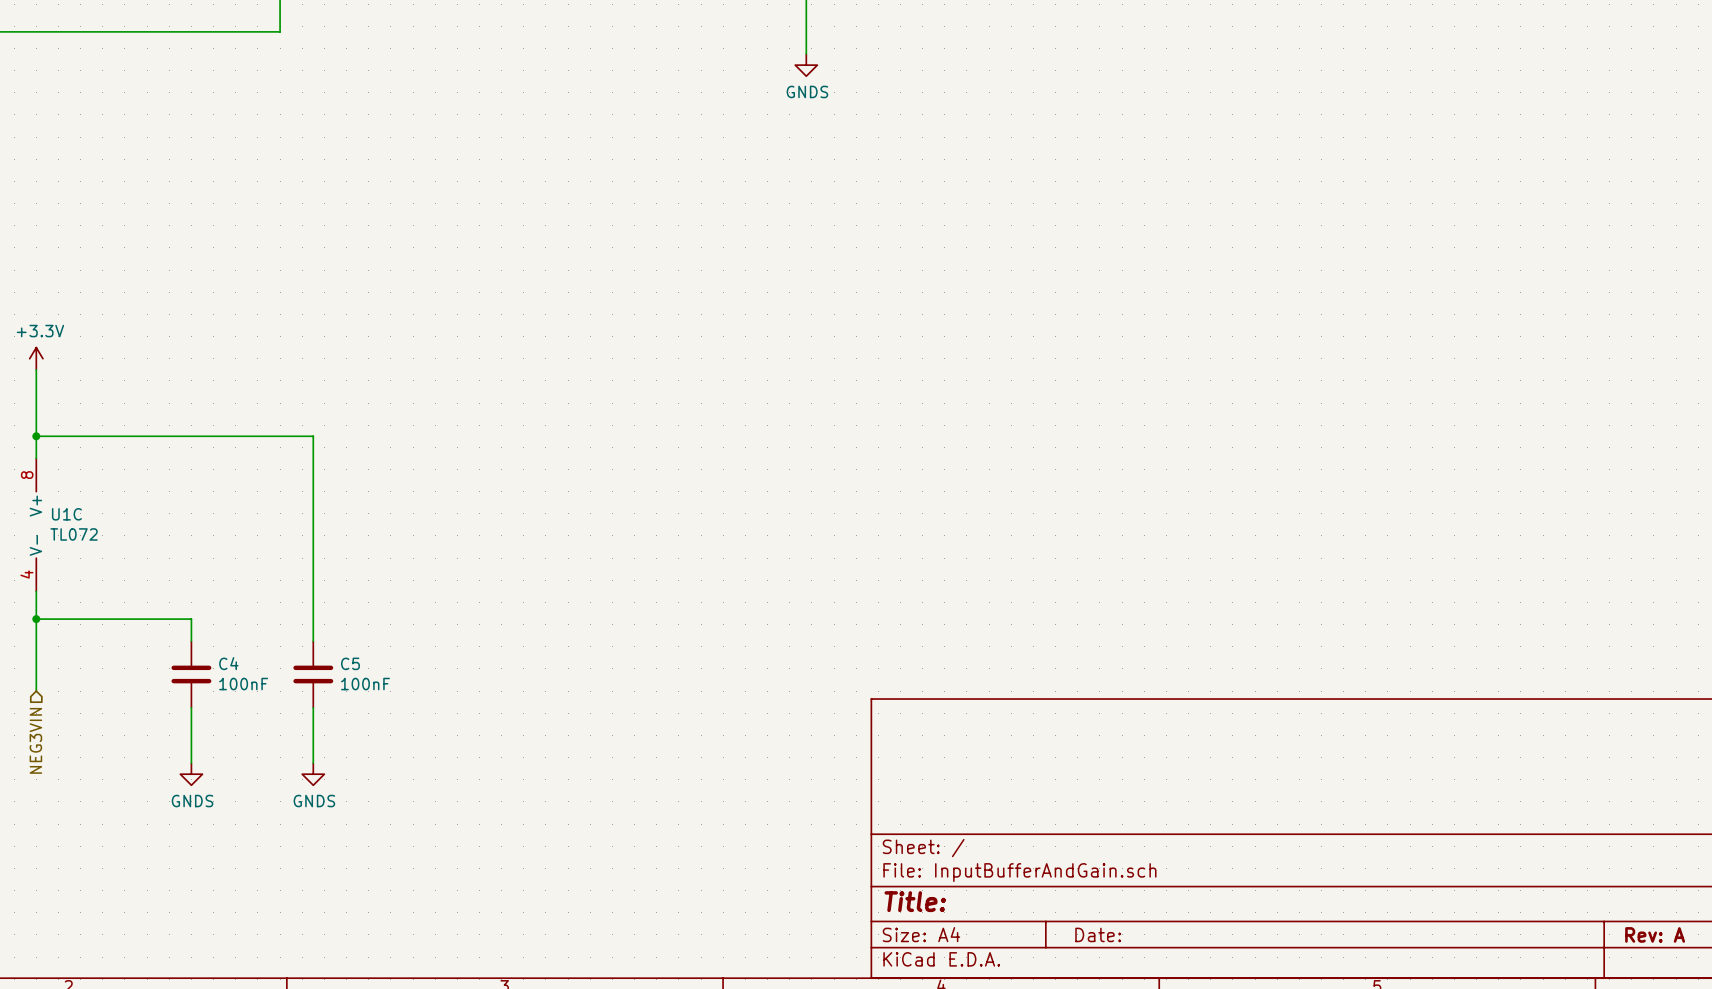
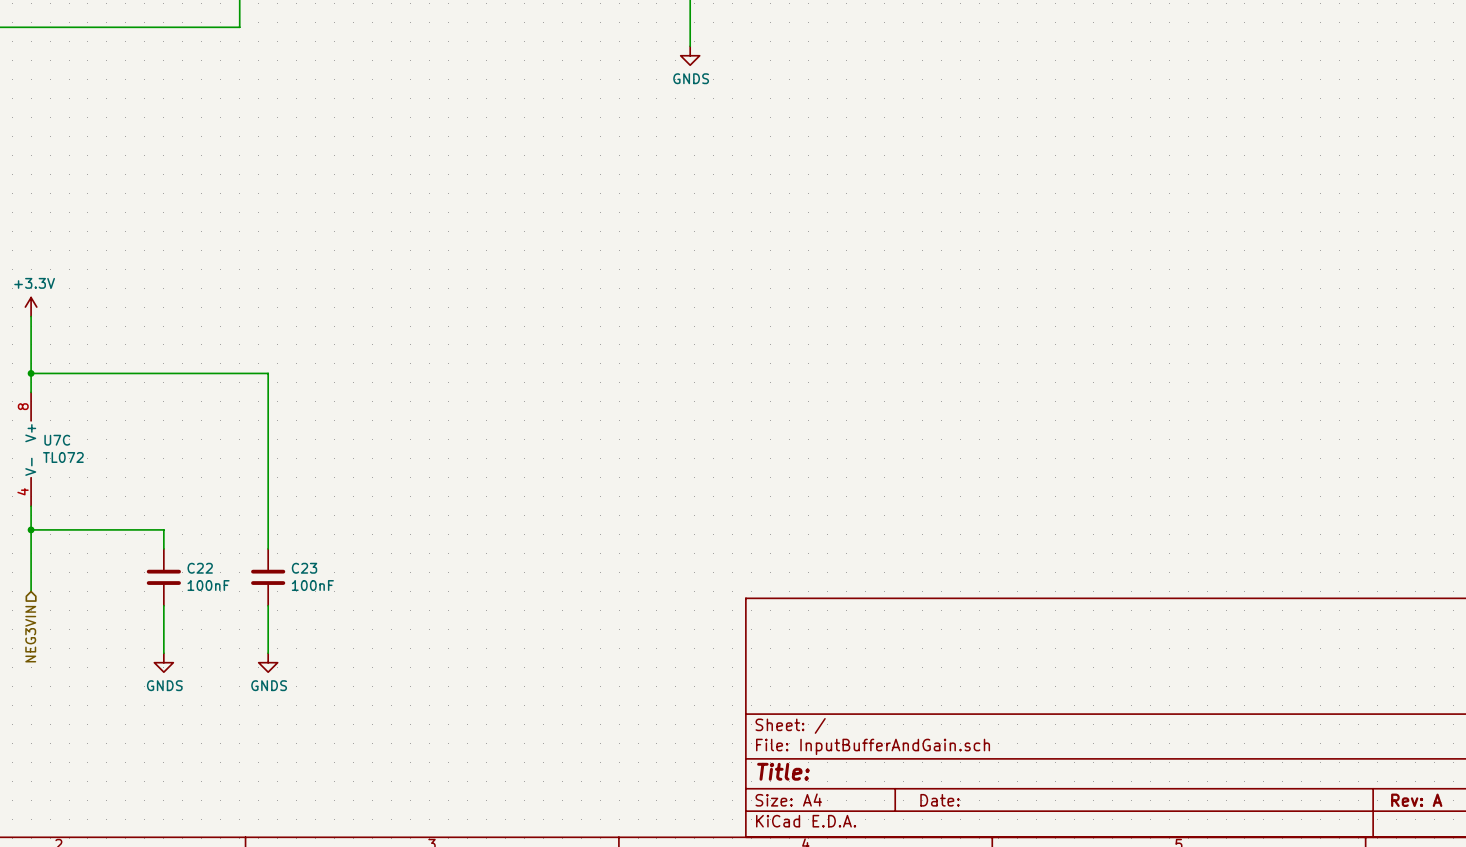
U1C name: U1C (66, 514) -> U7C (57, 440)
C4 name: C4 (228, 663) -> C22 (200, 568)
C5 name: C5 (350, 663) -> C23 (304, 568)

